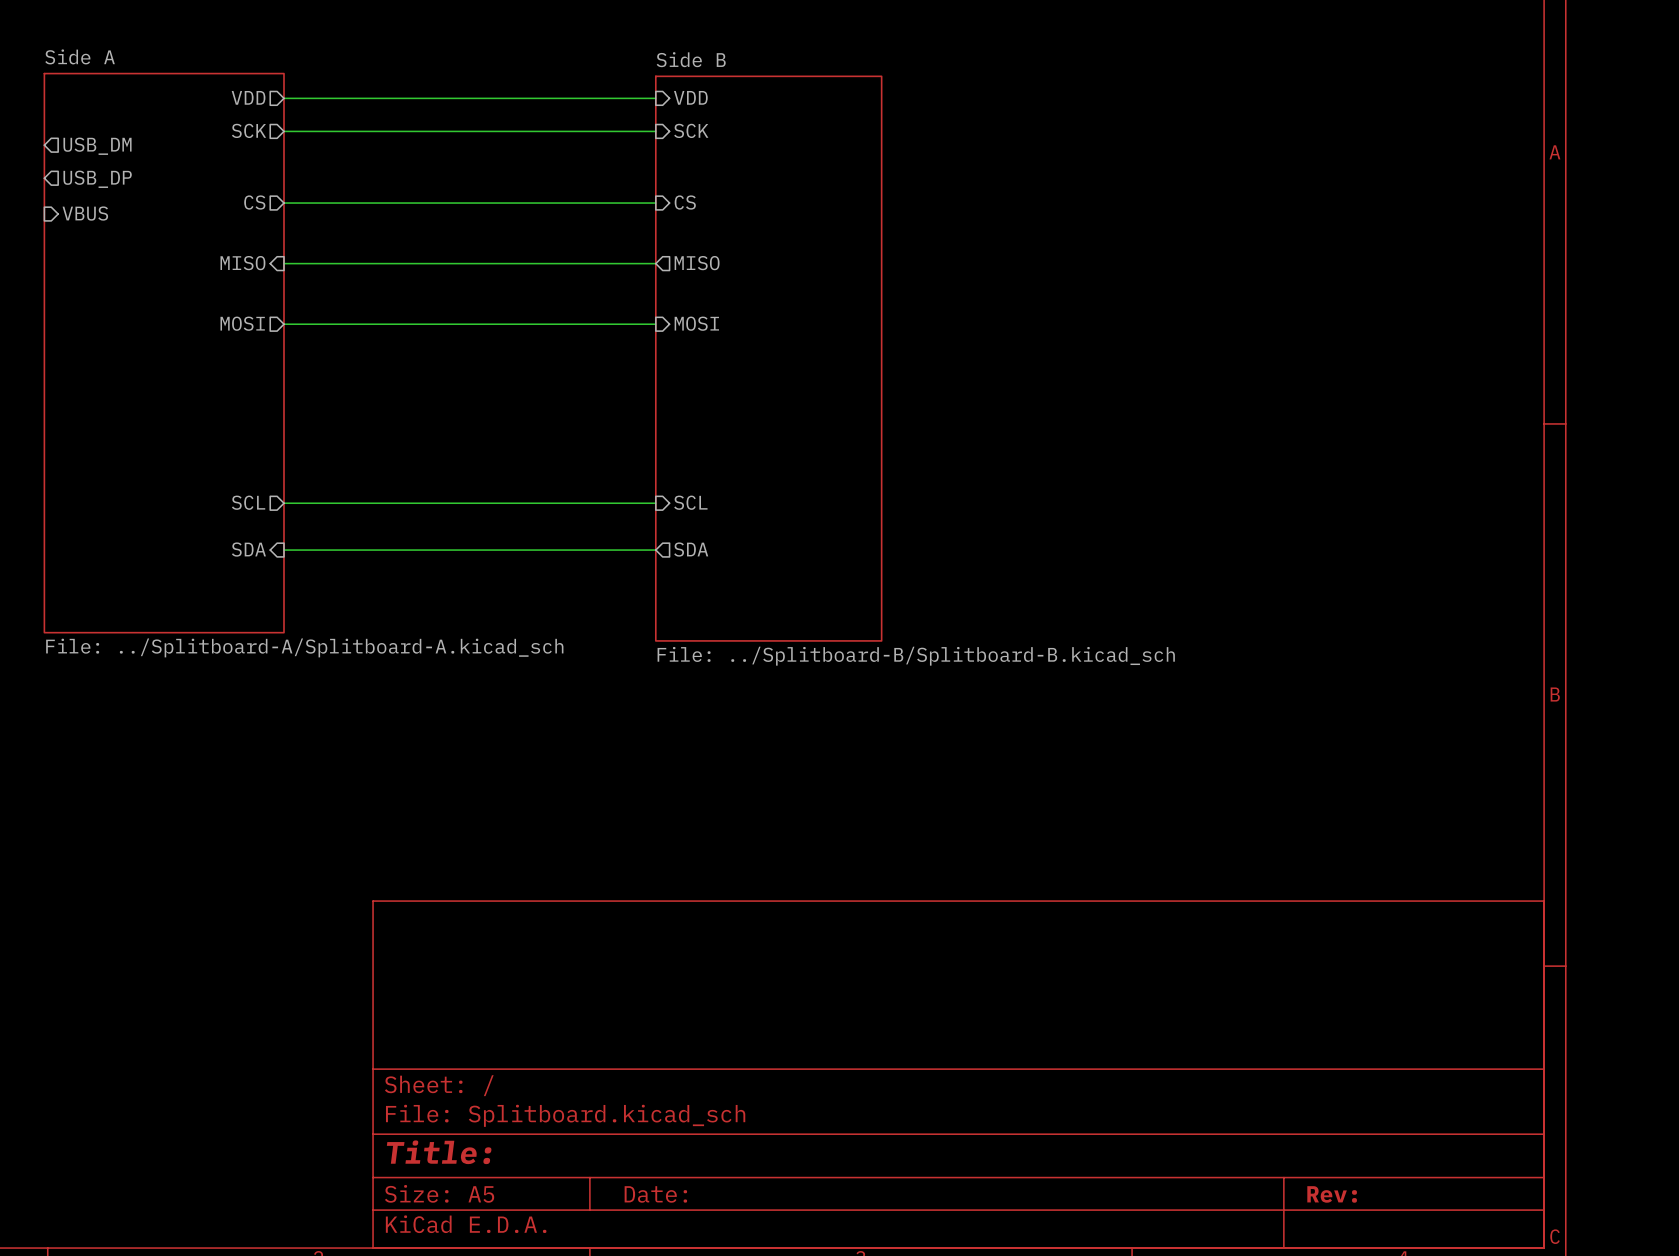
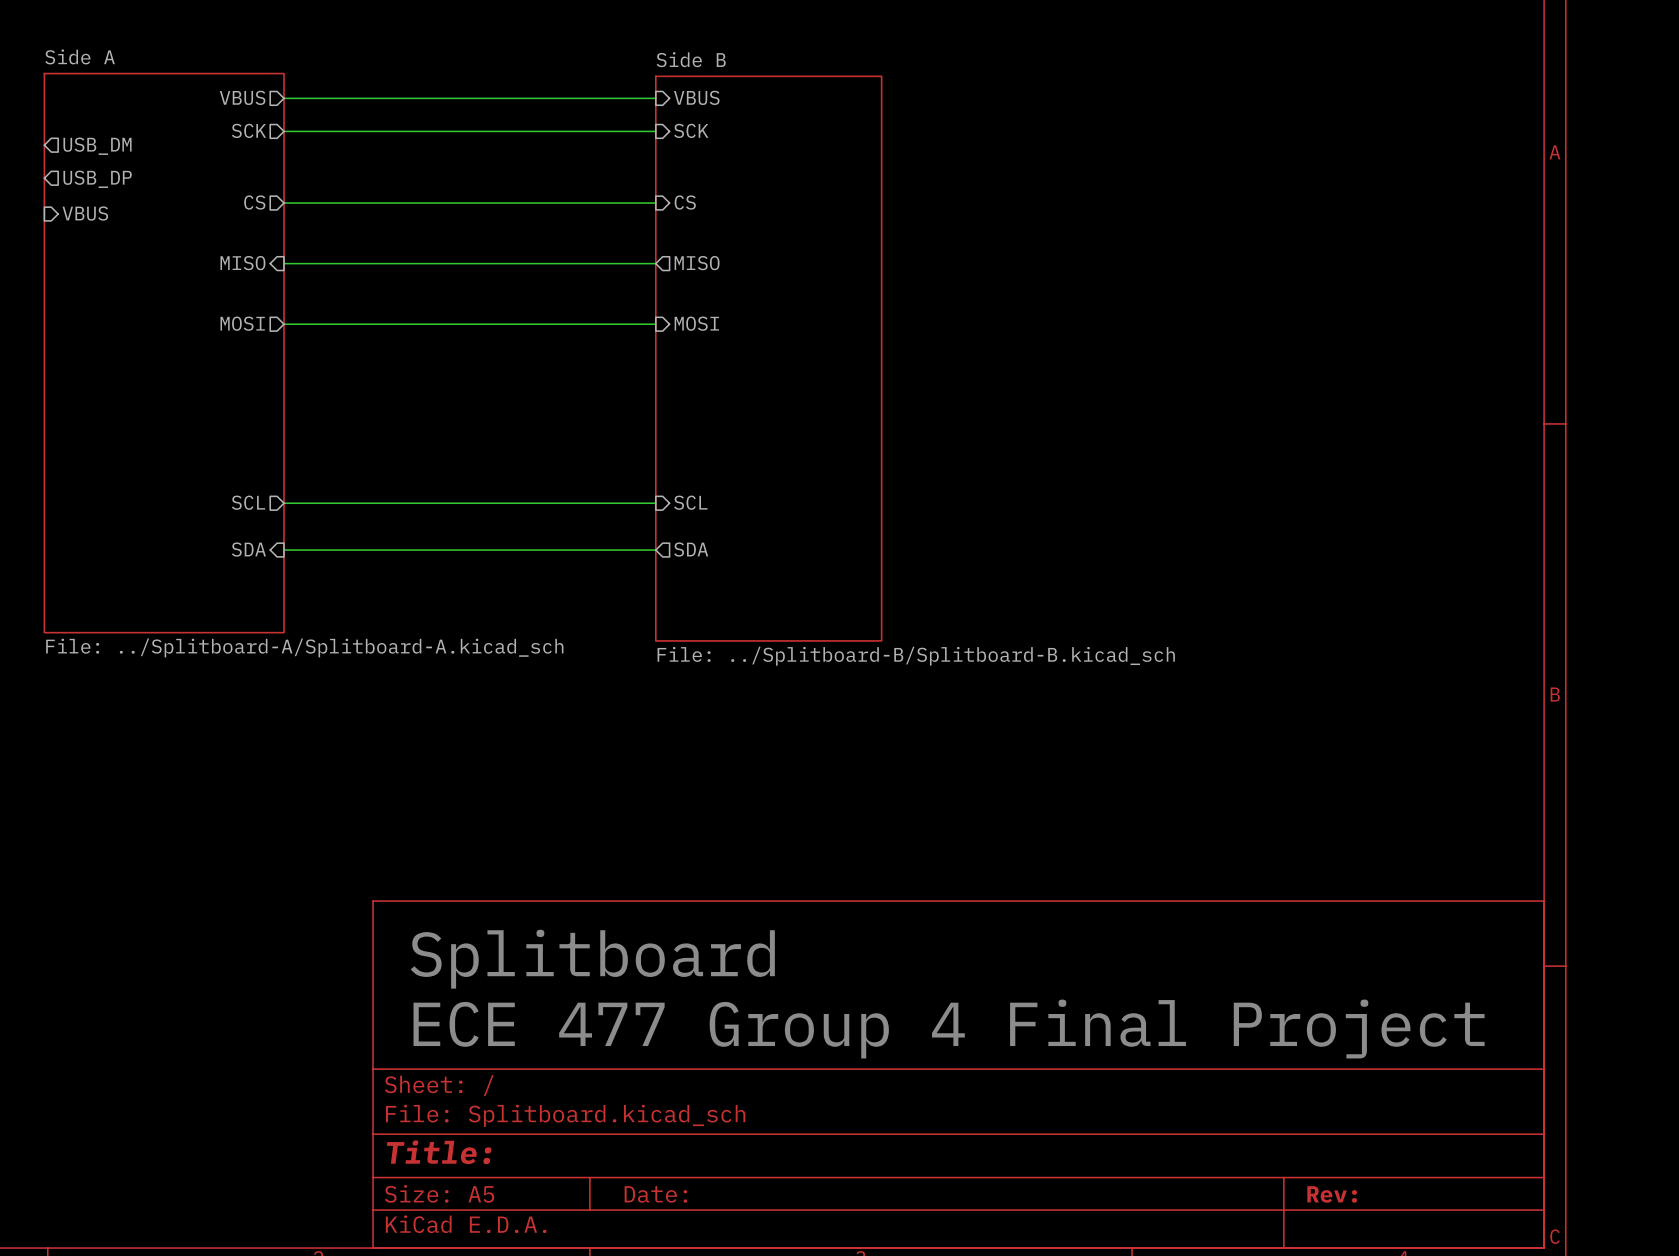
sheet pin: VDD (248, 97) -> VBUS (242, 97)
sheet pin: VDD (690, 97) -> VBUS (696, 97)
text: none -> Splitboard (592, 959)
text: none -> ECE 477 Group 4 Final Project (949, 1029)

